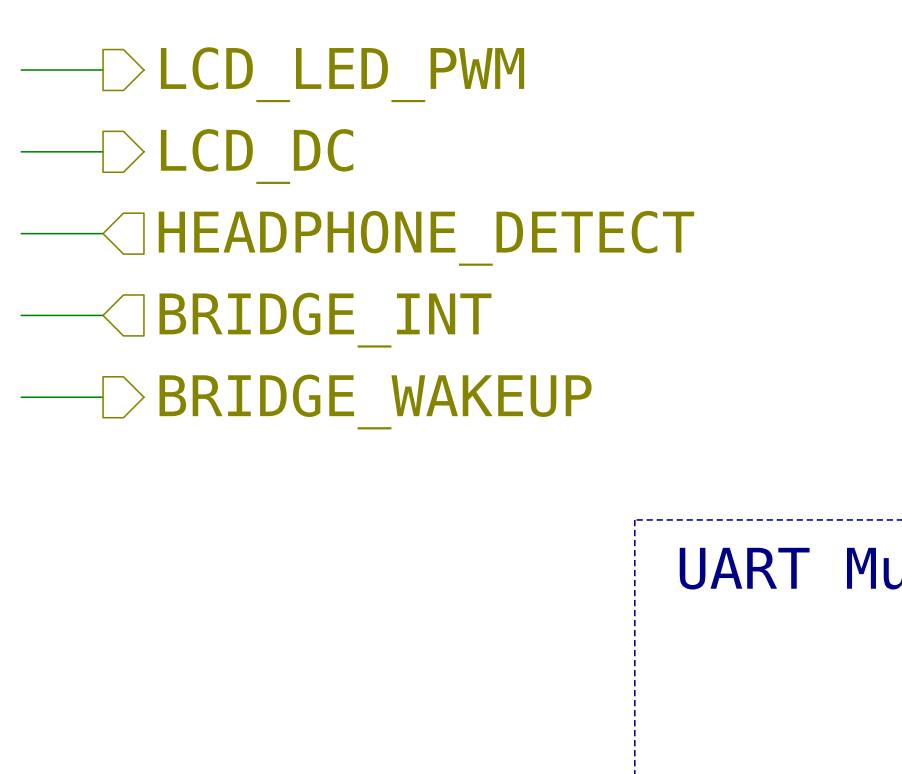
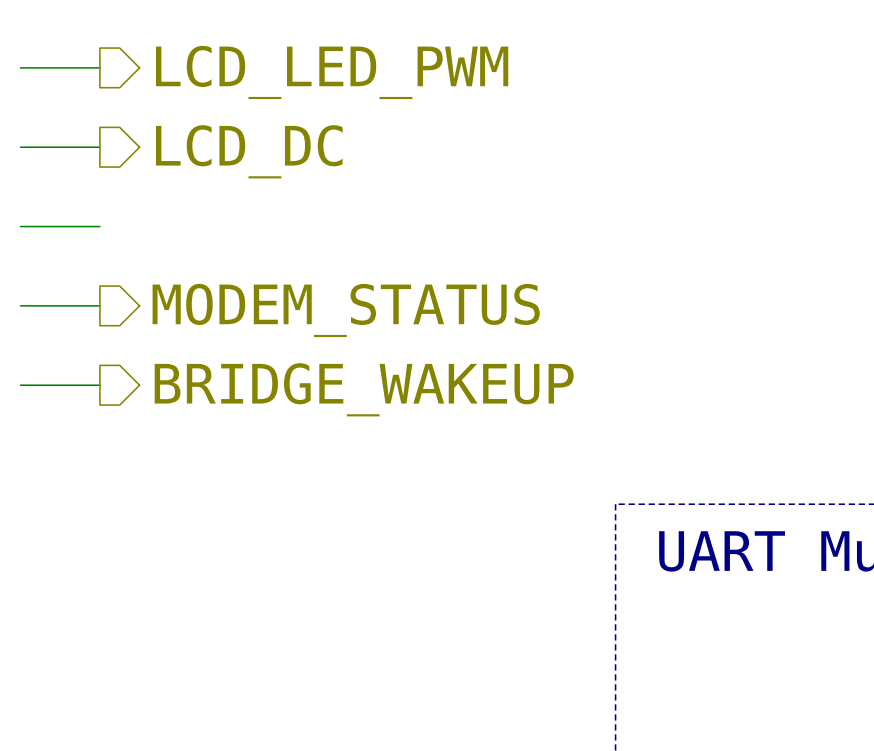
hierarchical label: HEADPHONE_DETECT (426, 238) -> none
hierarchical label shape: input (325, 320) -> output (346, 310)
hierarchical label: BRIDGE_INT (325, 320) -> MODEM_STATUS (346, 310)

